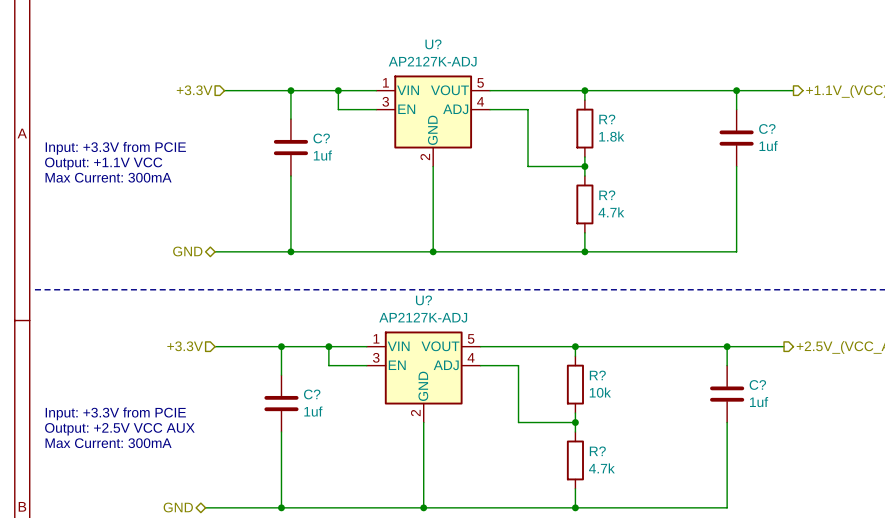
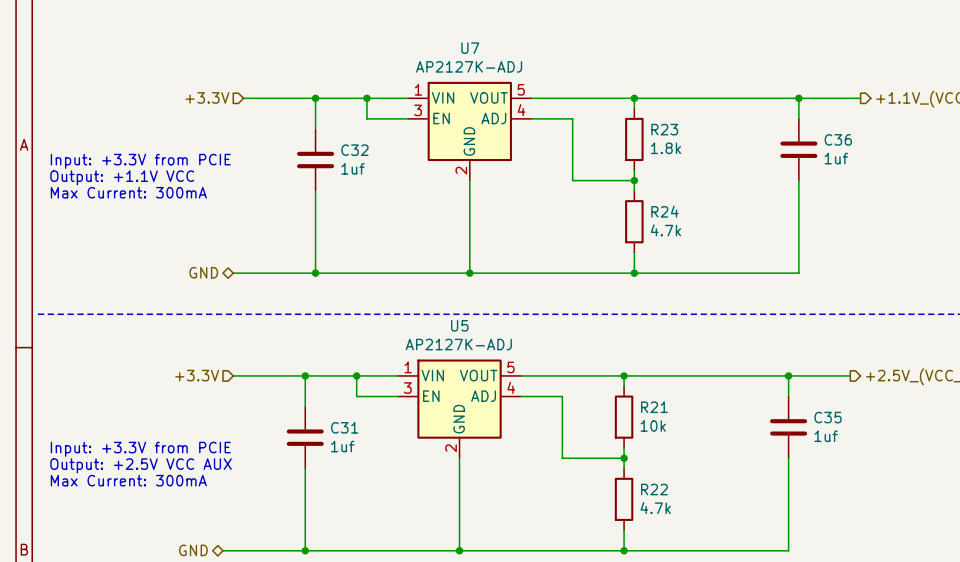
U? name: U? (433, 44) -> U7 (470, 48)
R? name: R? (607, 119) -> R23 (664, 129)
C? name: C? (767, 128) -> C36 (838, 139)
C? name: C? (321, 138) -> C32 (354, 150)
R? name: R? (607, 195) -> R24 (664, 211)
U? name: U? (423, 300) -> U5 (459, 325)
R? name: R? (597, 375) -> R21 (654, 407)
C? name: C? (757, 384) -> C35 (827, 417)
C? name: C? (312, 394) -> C31 (344, 427)
R? name: R? (597, 451) -> R22 (654, 489)

